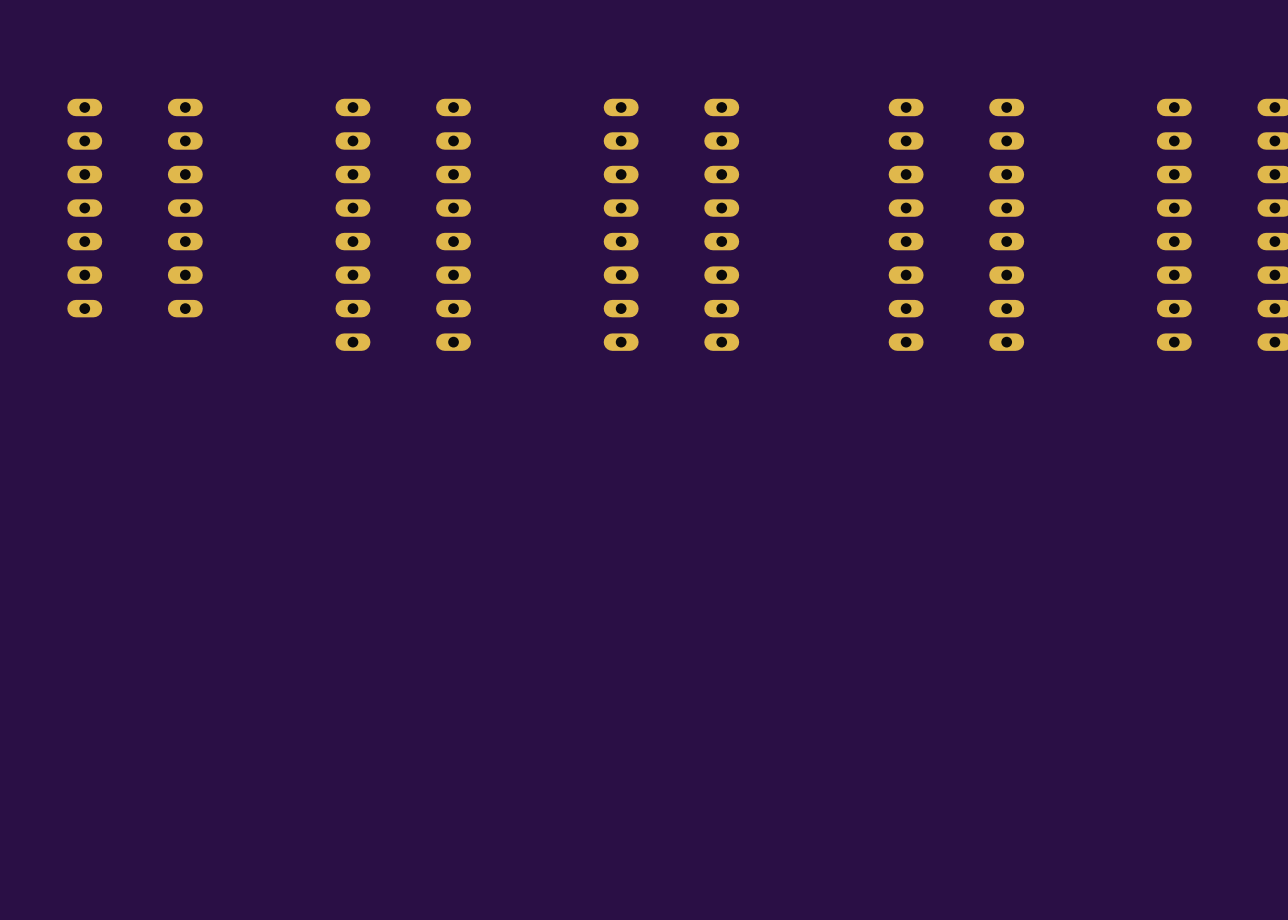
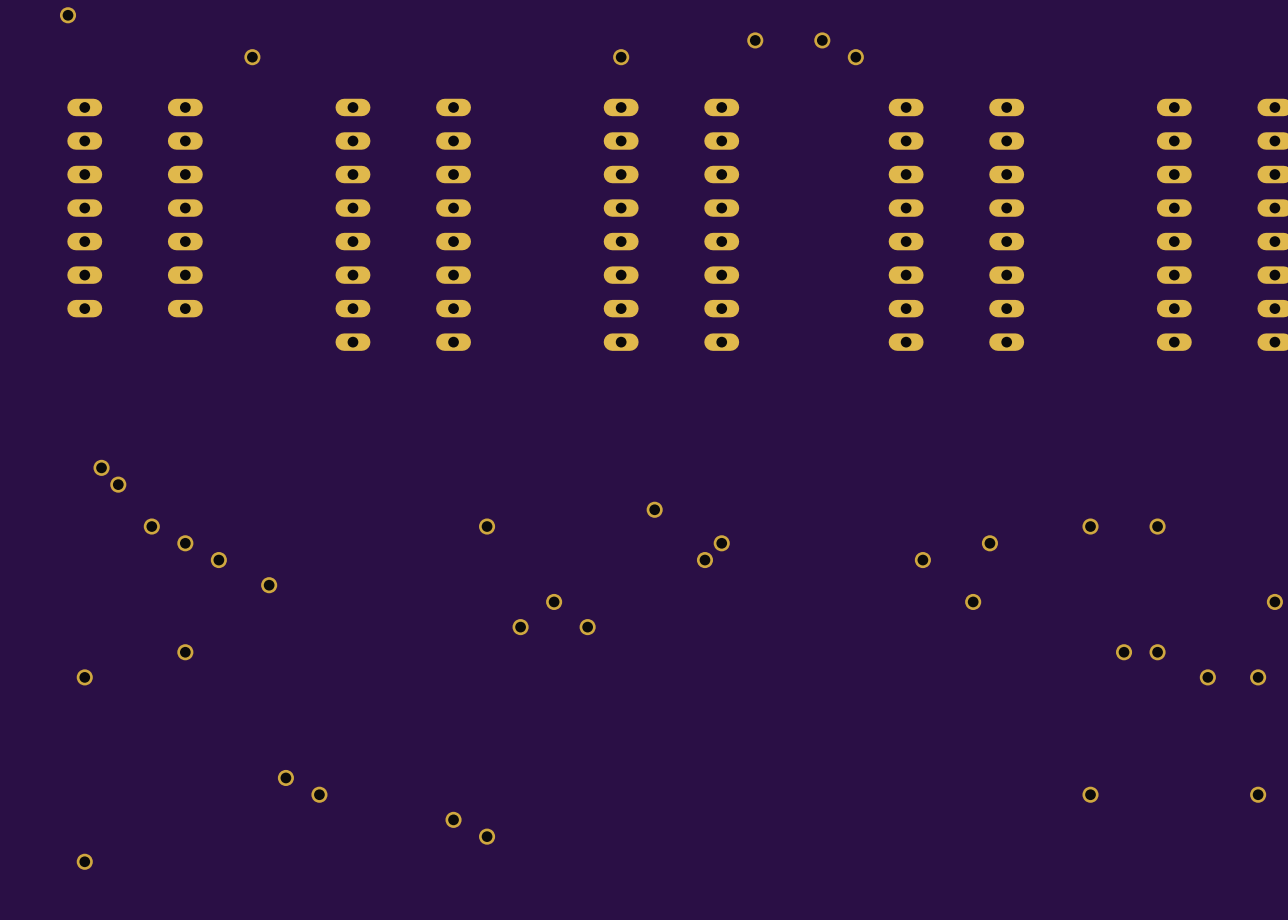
via: none -> (68, 15)
via: none -> (755, 40)
via: none -> (822, 40)
via: none -> (252, 57)
via: none -> (621, 57)
via: none -> (855, 57)
via: none -> (101, 467)
via: none -> (118, 484)
via: none -> (654, 509)
via: none -> (151, 526)
via: none -> (487, 526)
via: none -> (1090, 526)
via: none -> (1157, 526)
via: none -> (185, 543)
via: none -> (721, 543)
via: none -> (989, 543)
via: none -> (218, 560)
via: none -> (704, 560)
via: none -> (922, 560)
via: none -> (269, 585)
via: none -> (554, 601)
via: none -> (973, 601)
via: none -> (1274, 601)
via: none -> (520, 627)
via: none -> (587, 627)
via: none -> (185, 652)
via: none -> (1124, 652)
via: none -> (1157, 652)
via: none -> (84, 677)
via: none -> (1207, 677)
via: none -> (1258, 677)
via: none -> (285, 777)
via: none -> (319, 794)
via: none -> (1090, 794)
via: none -> (1258, 794)
via: none -> (453, 819)
via: none -> (487, 836)
via: none -> (84, 861)

